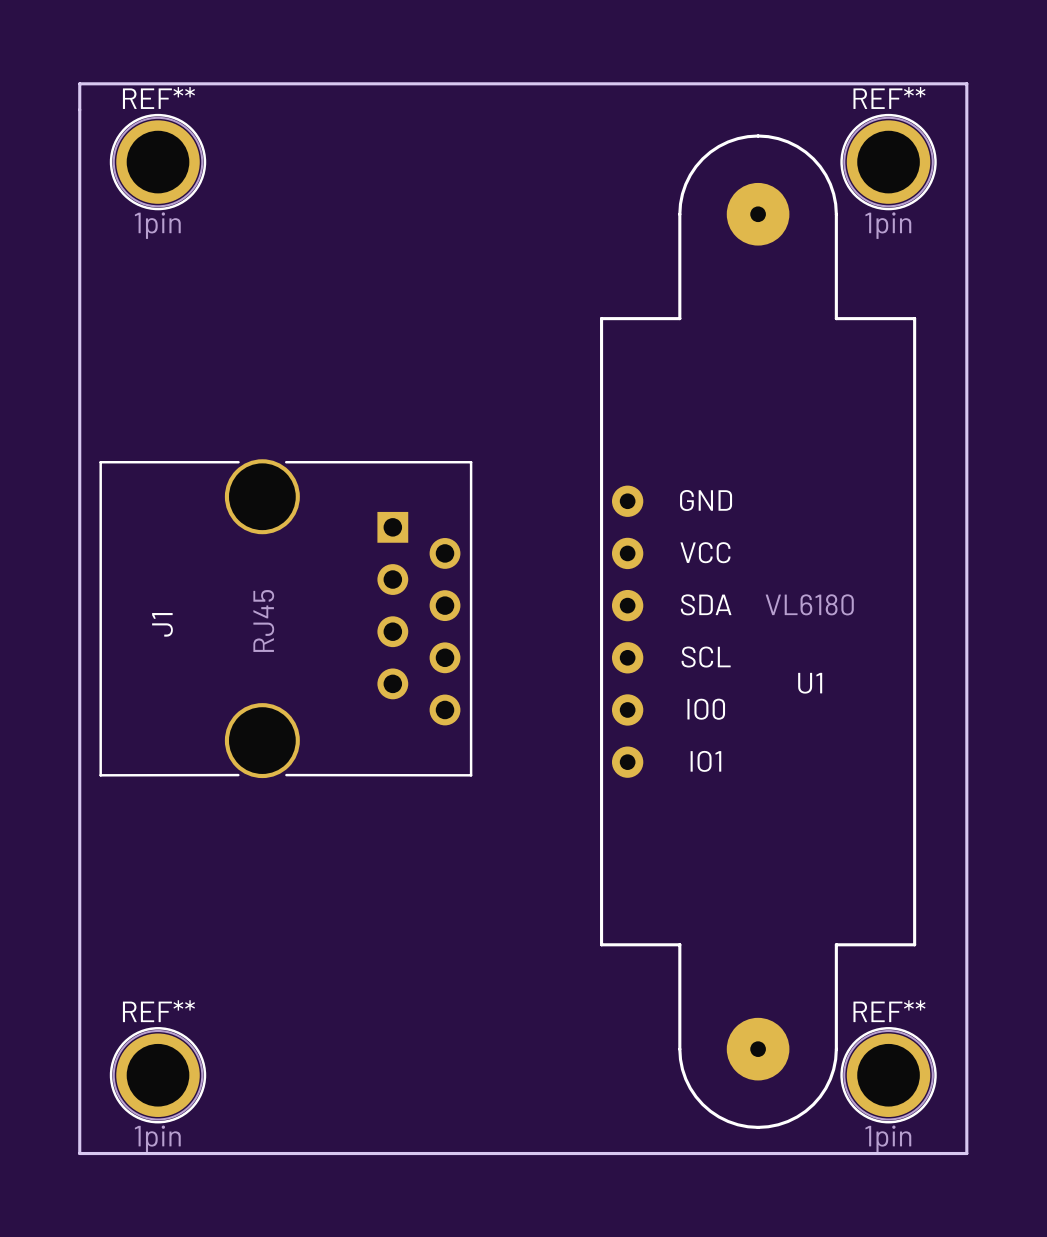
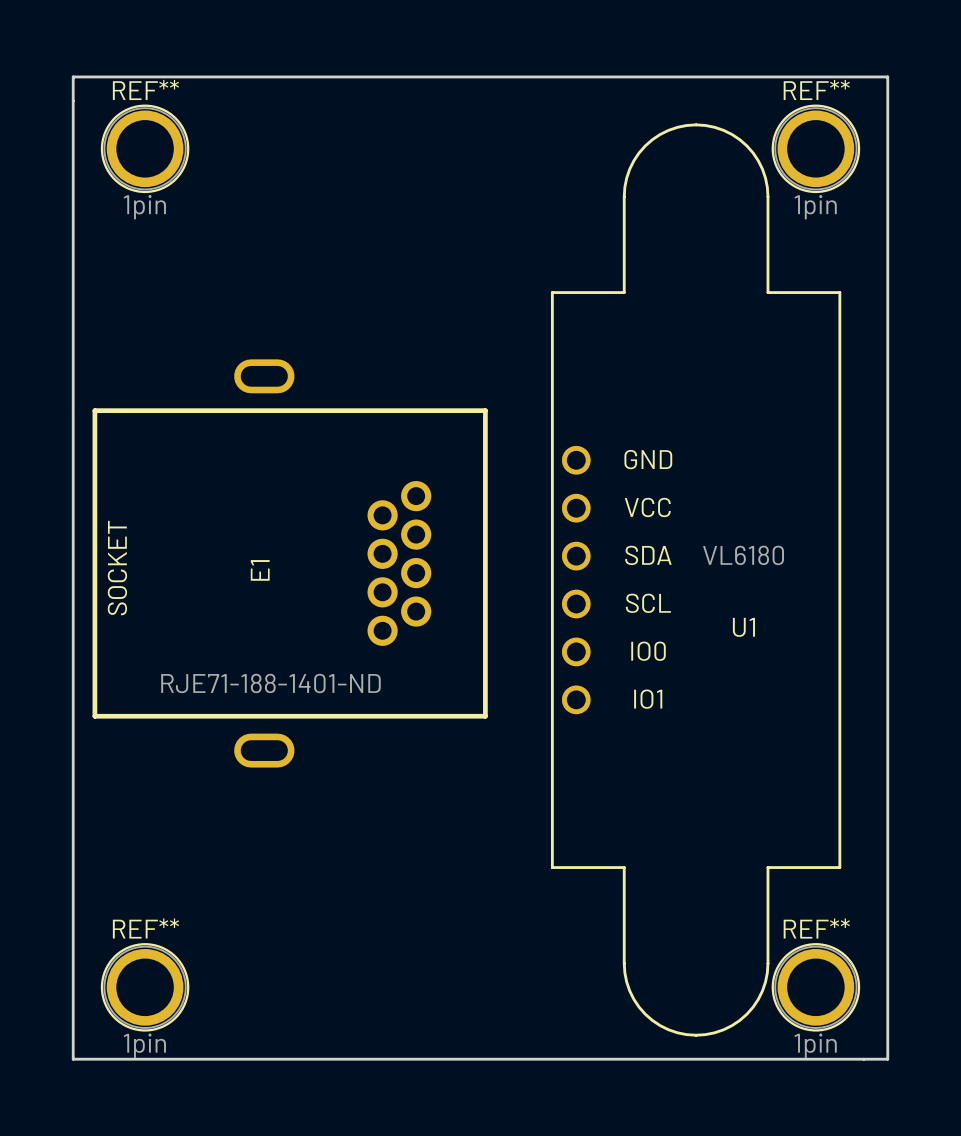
U1 footprint: [600, 134, 917, 1129] -> [550, 123, 842, 1037]
E1: none -> RJE71-188-1401-ND (290, 563)
J1: RJ45 (285, 618) -> none

